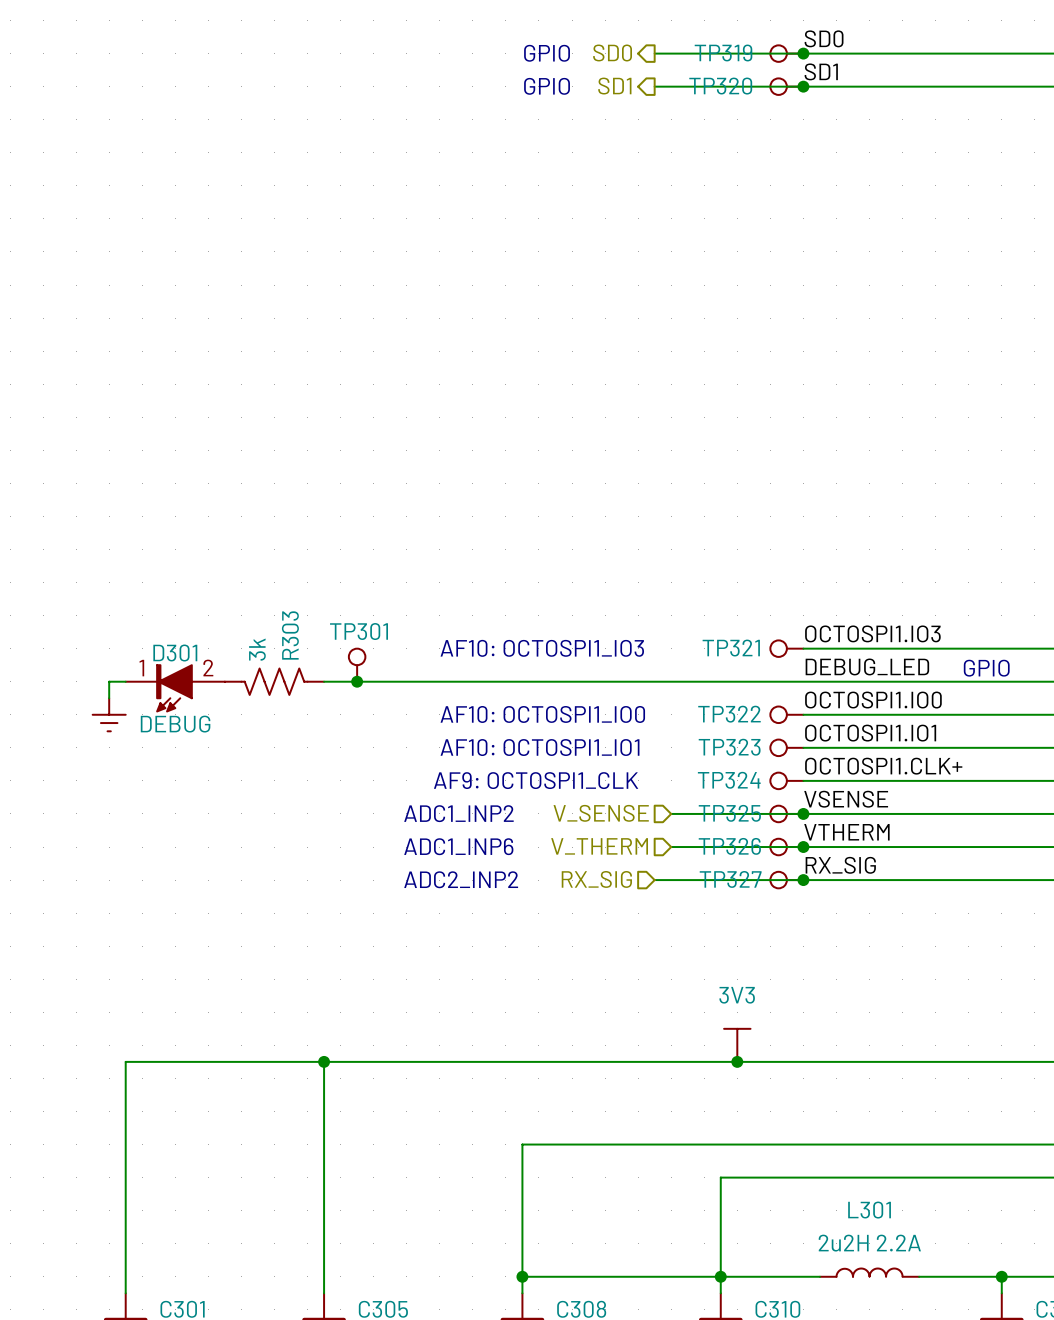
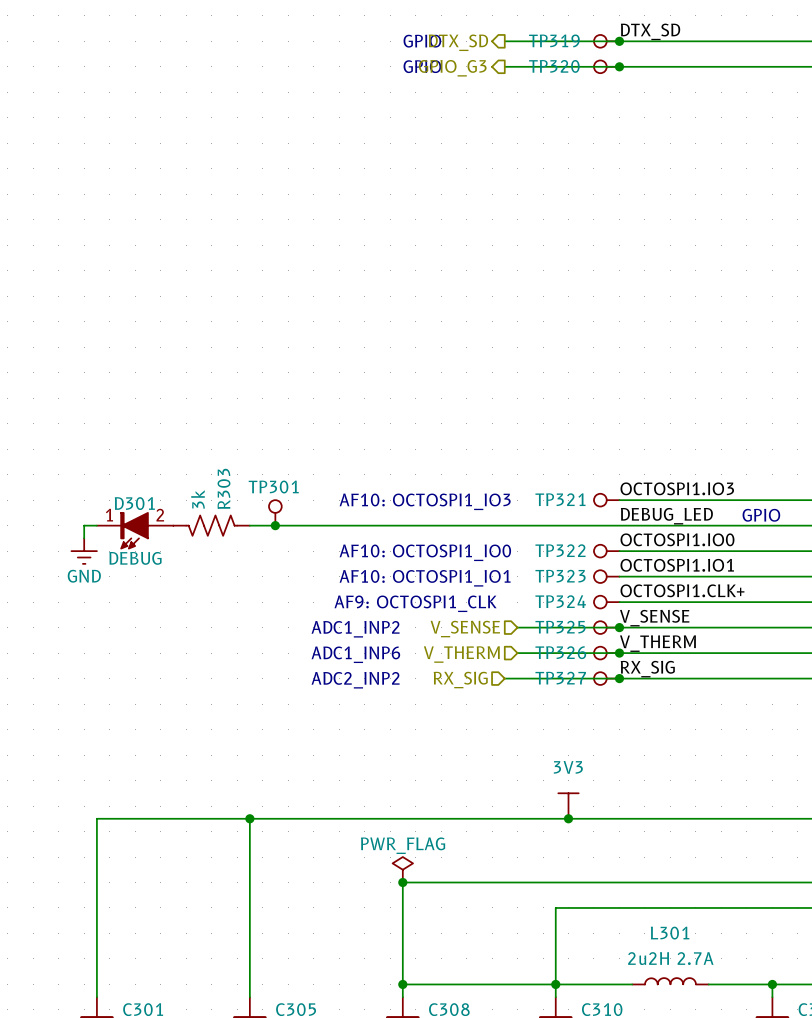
label: SD0 (824, 38) -> DTX_SD (650, 31)
hierarchical label: SD0 (612, 52) -> DTX_SD (458, 42)
label: SD1 (821, 71) -> none
hierarchical label: SD1 (614, 86) -> GPIO_G3 (452, 68)
power symbol text: none -> GND (84, 576)
label: VSENSE (846, 799) -> V_SENSE (654, 618)
label: VTHERM (846, 832) -> V_THERM (657, 643)
power symbol: none -> PWR_FLAG (402, 869)
junction: none -> (402, 882)
L301 value: 2u2H 2.2A (869, 1243) -> 2u2H 2.7A (670, 958)

